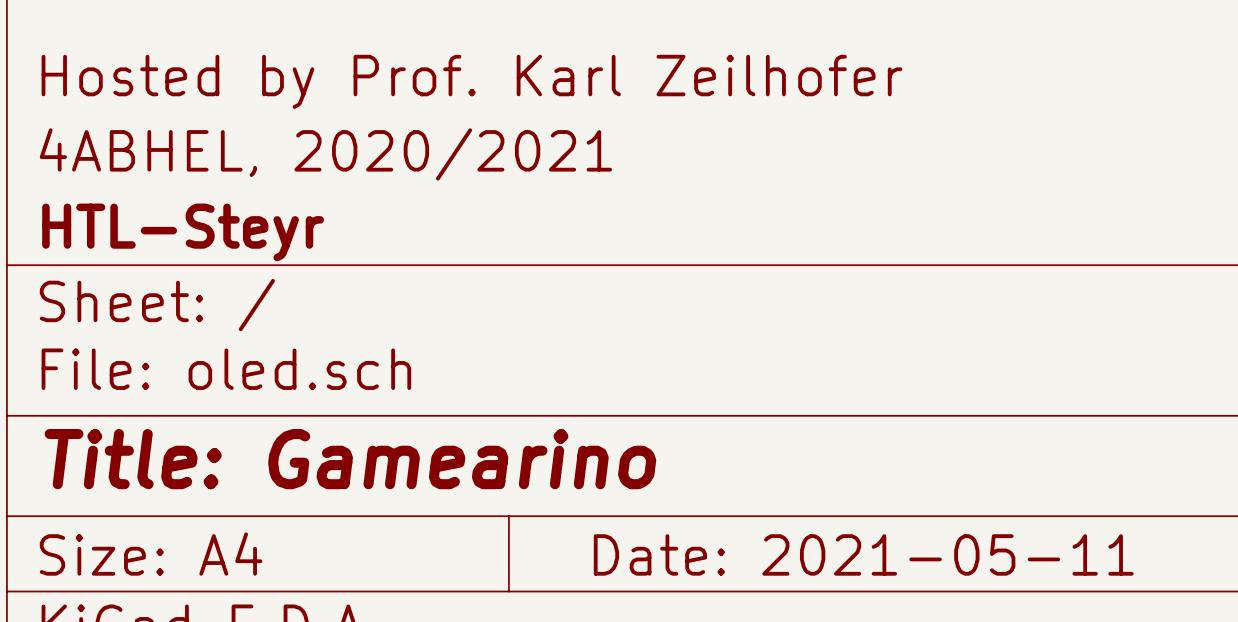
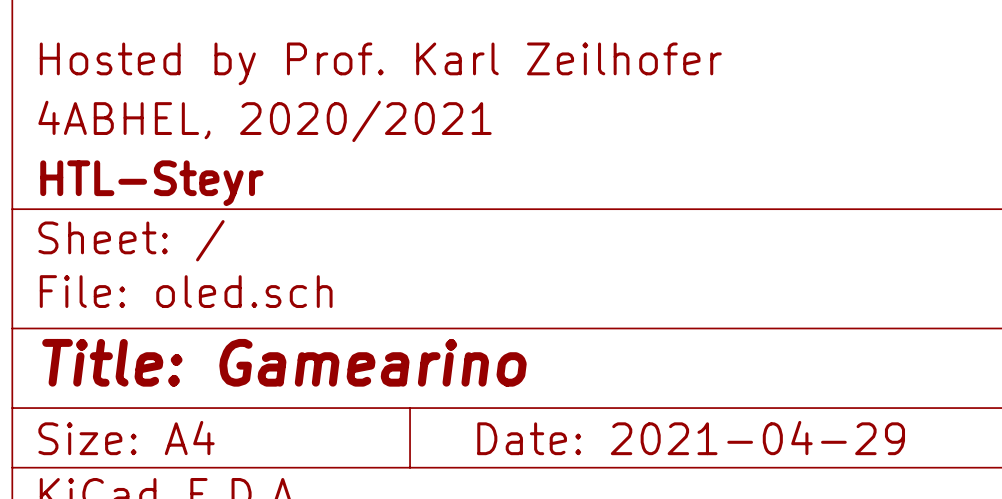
title block: Date: 2021-05-11 (863, 554) -> Date: 2021-04-29 (691, 438)

